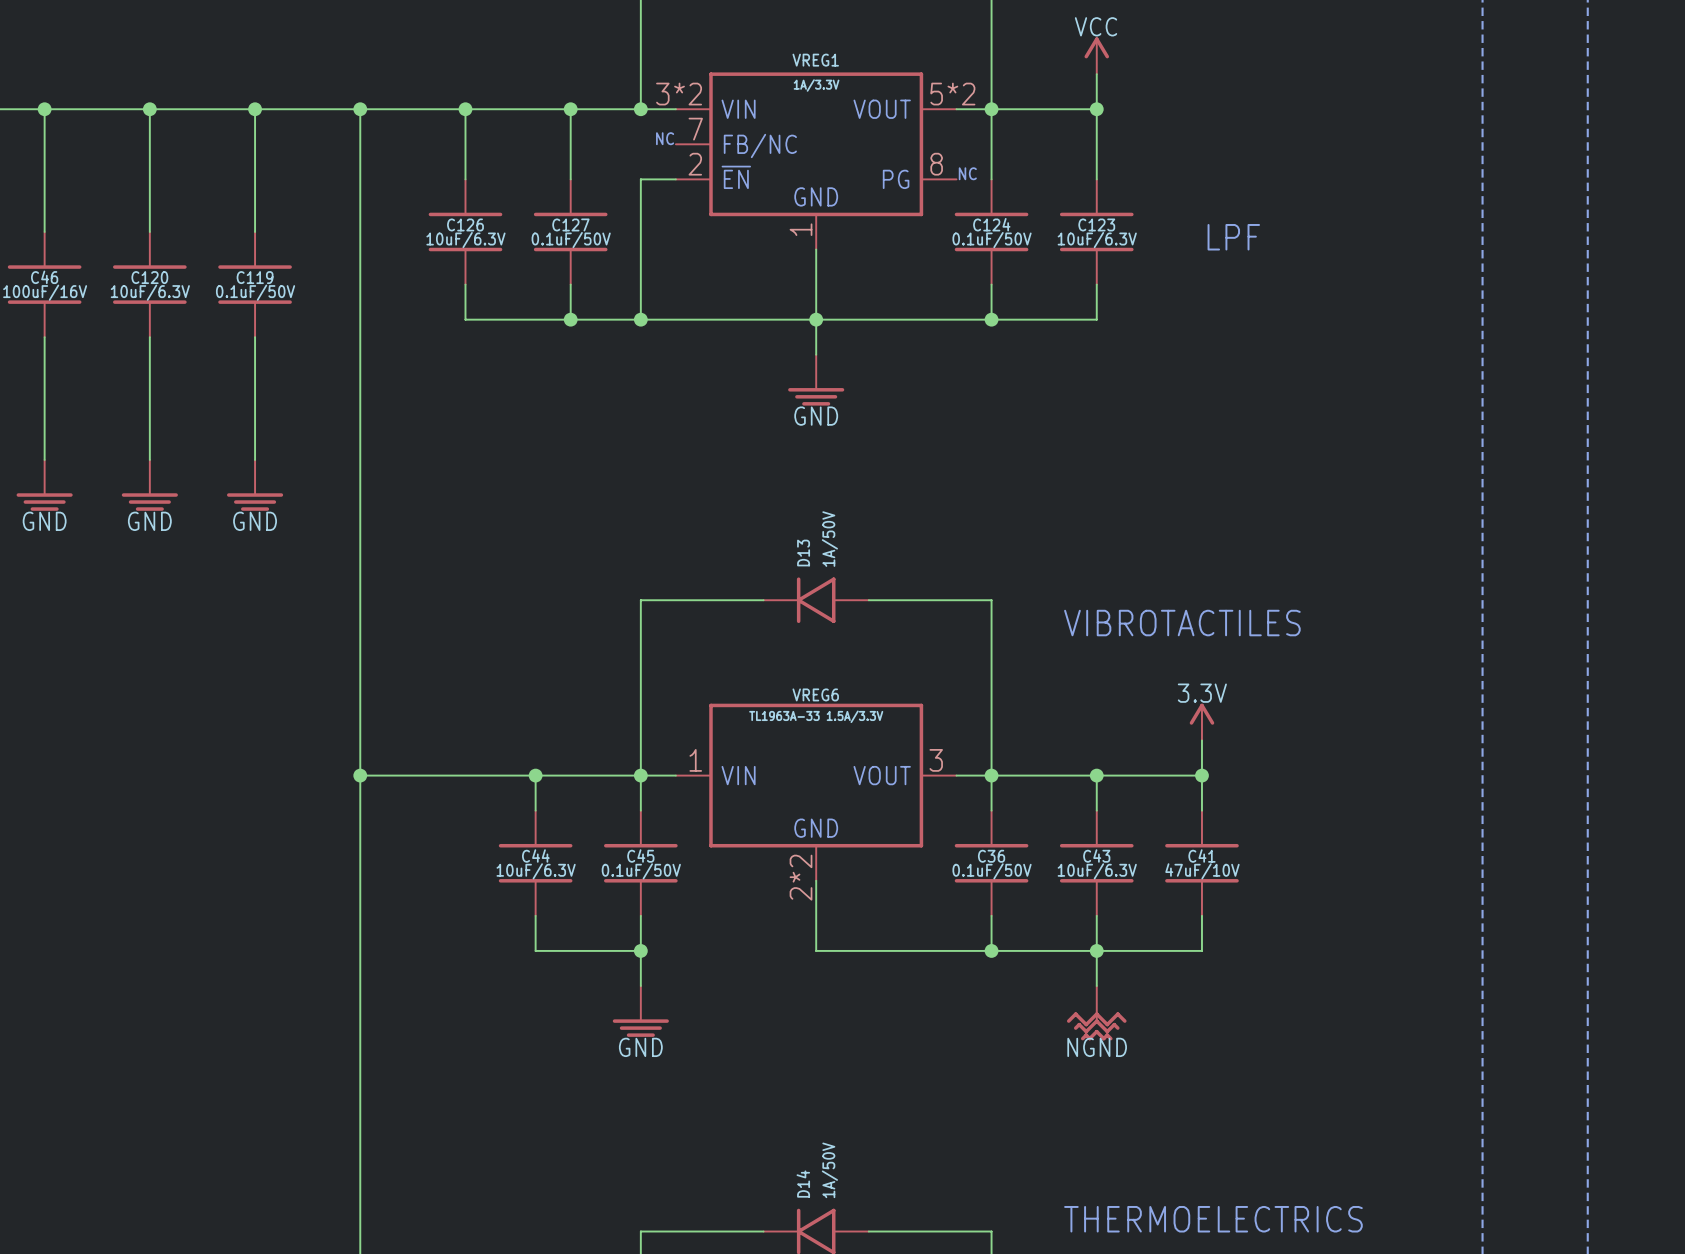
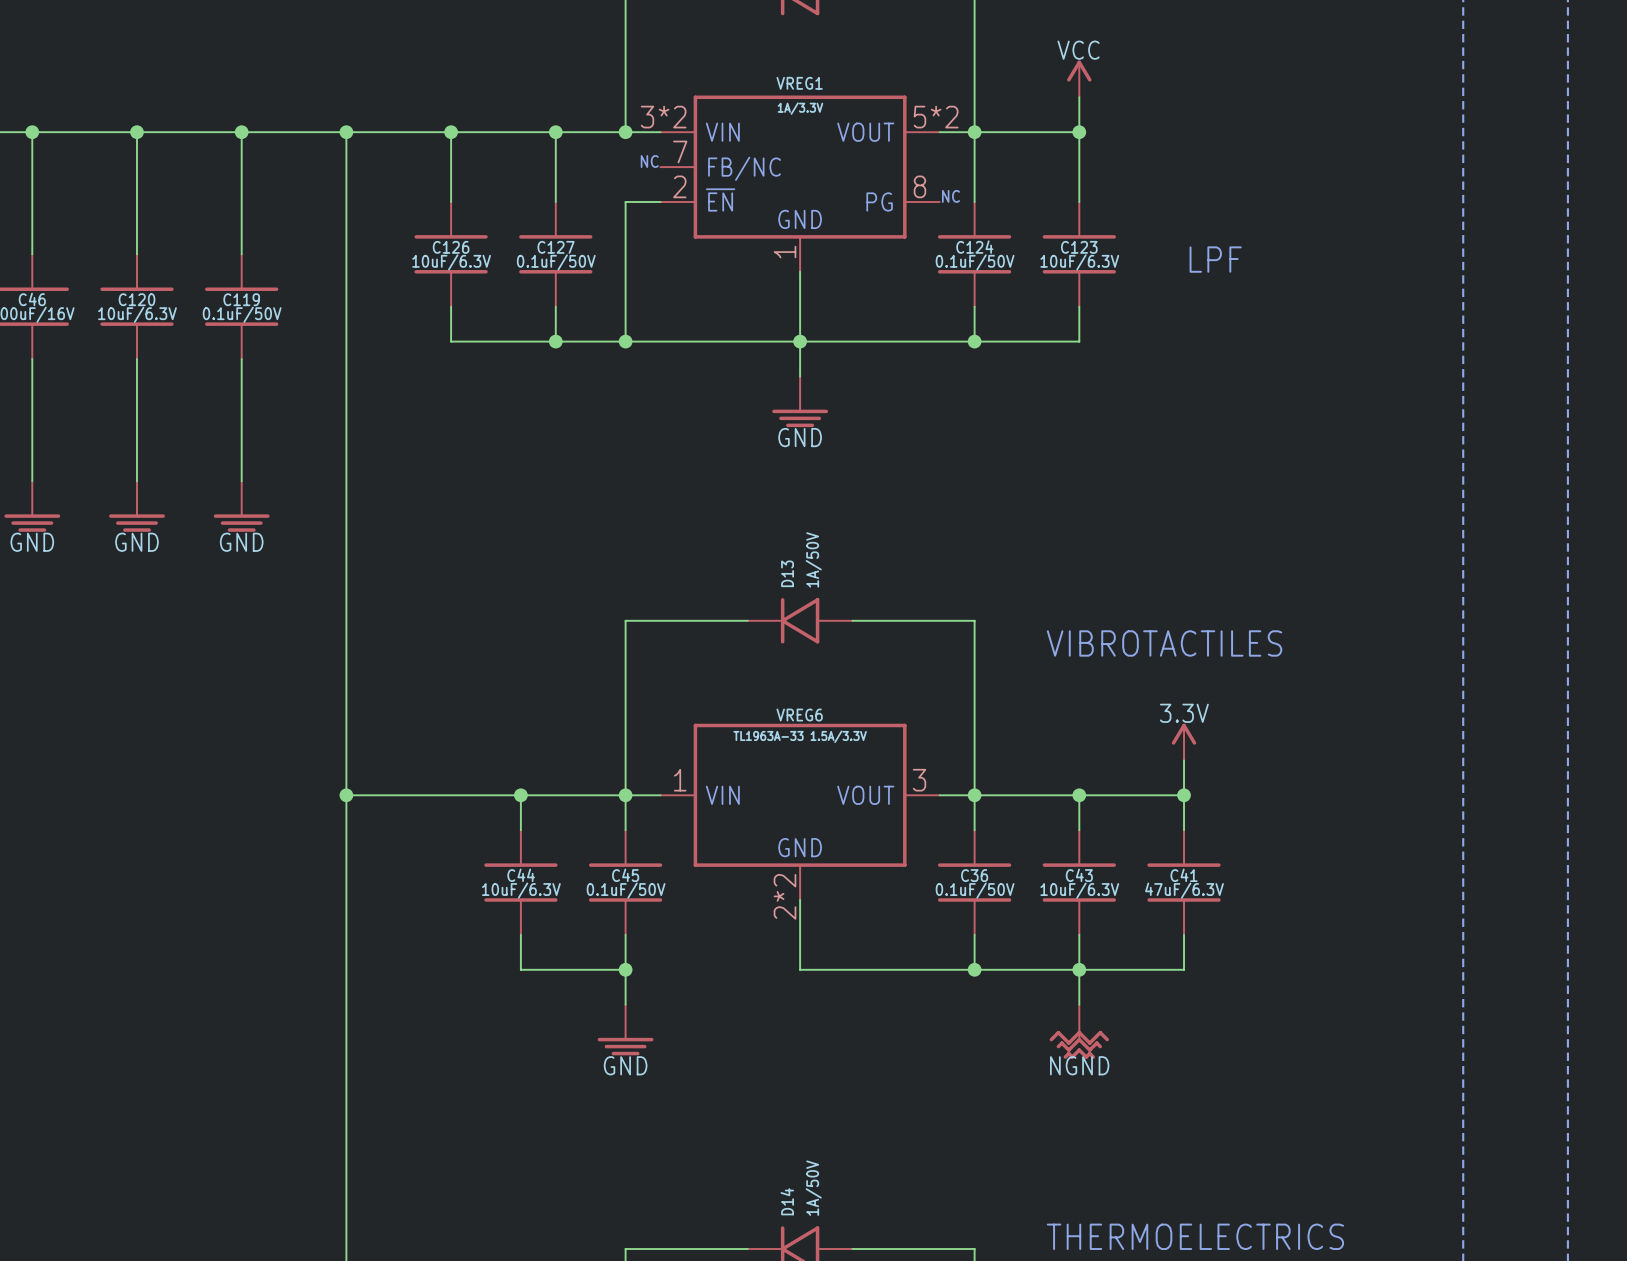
C41 value: 47uF/10V (1202, 871) -> 47uF/6.3V (1184, 890)

